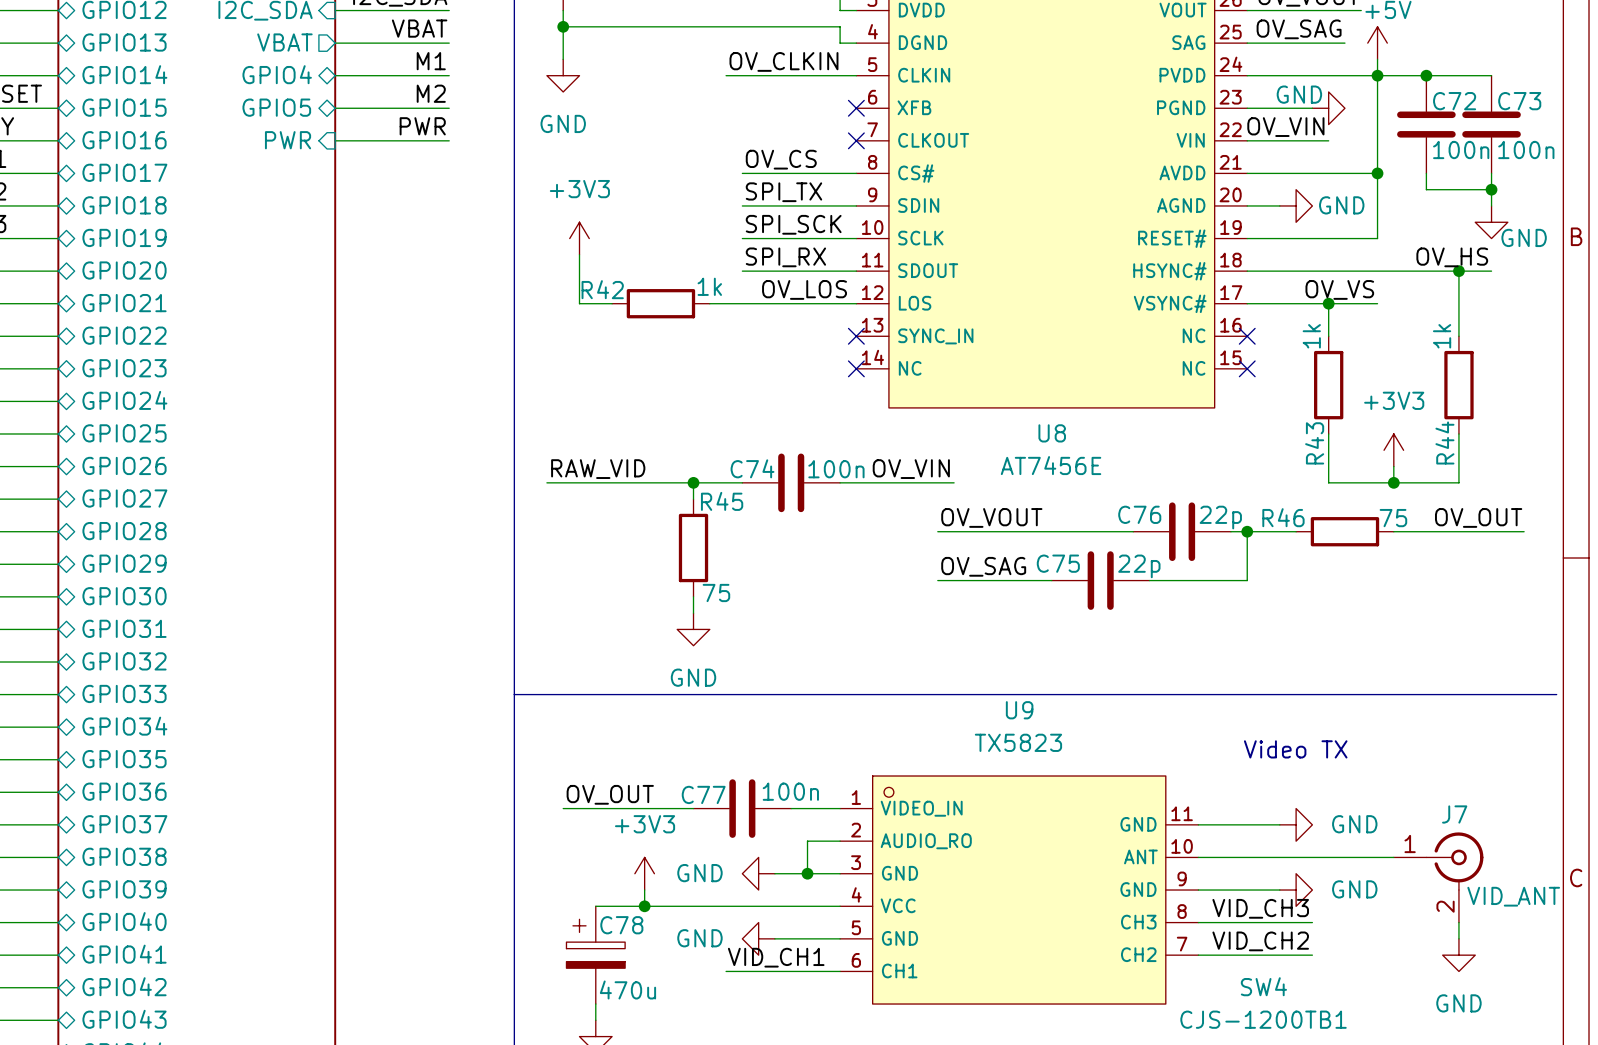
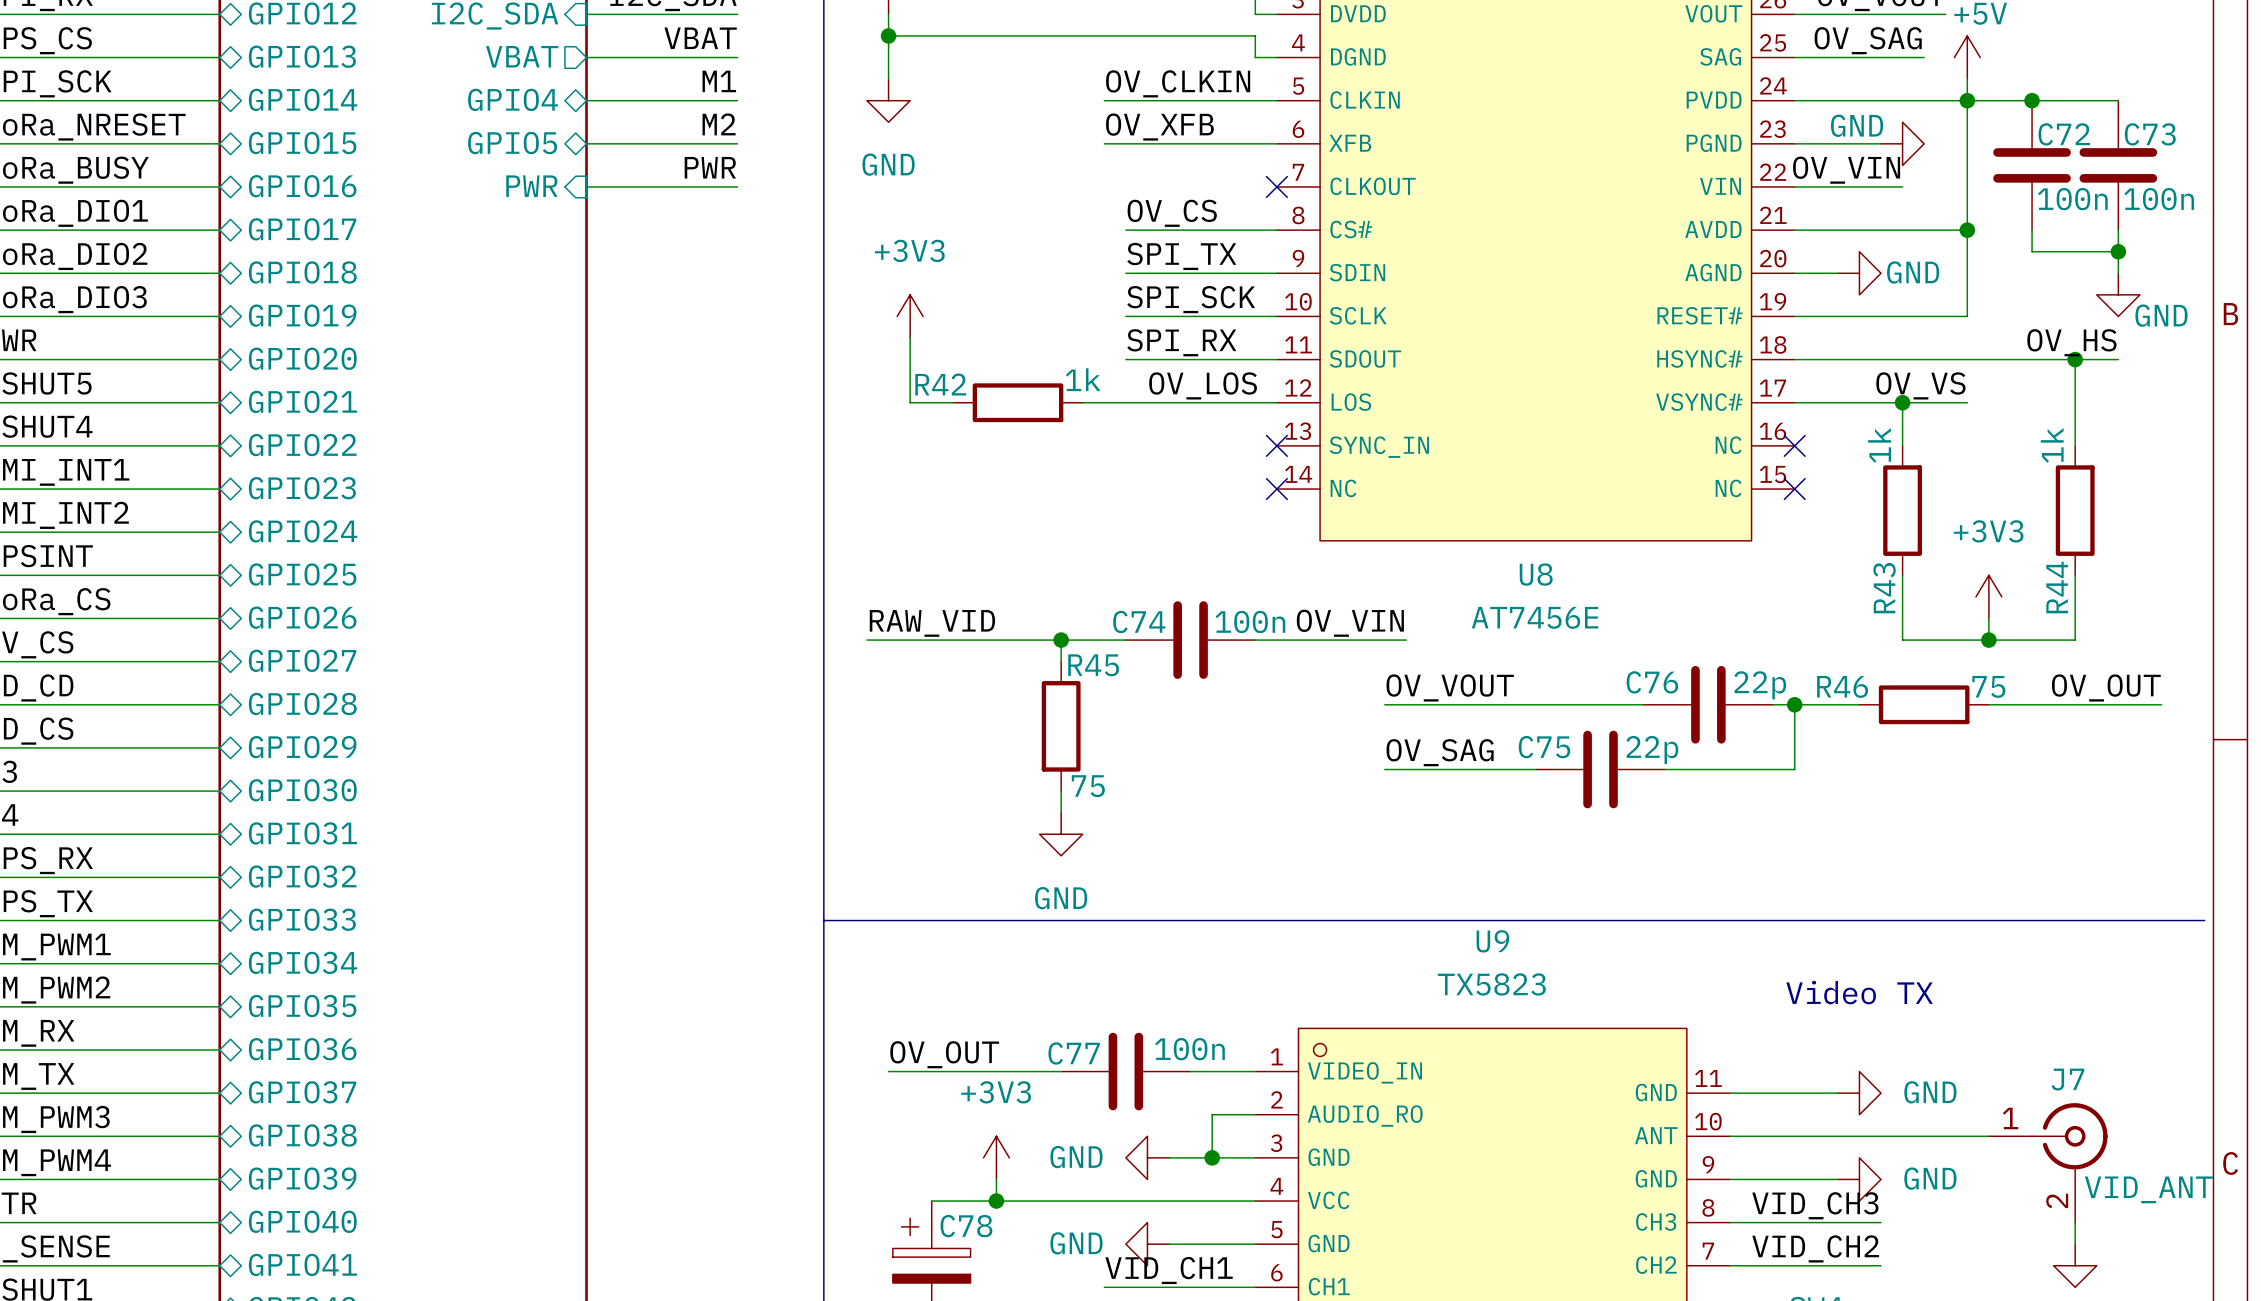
label: none -> OV_XFB (1159, 127)
wire: none -> (1104, 143) (1276, 143)
no-connect mark: (856, 108) -> none

